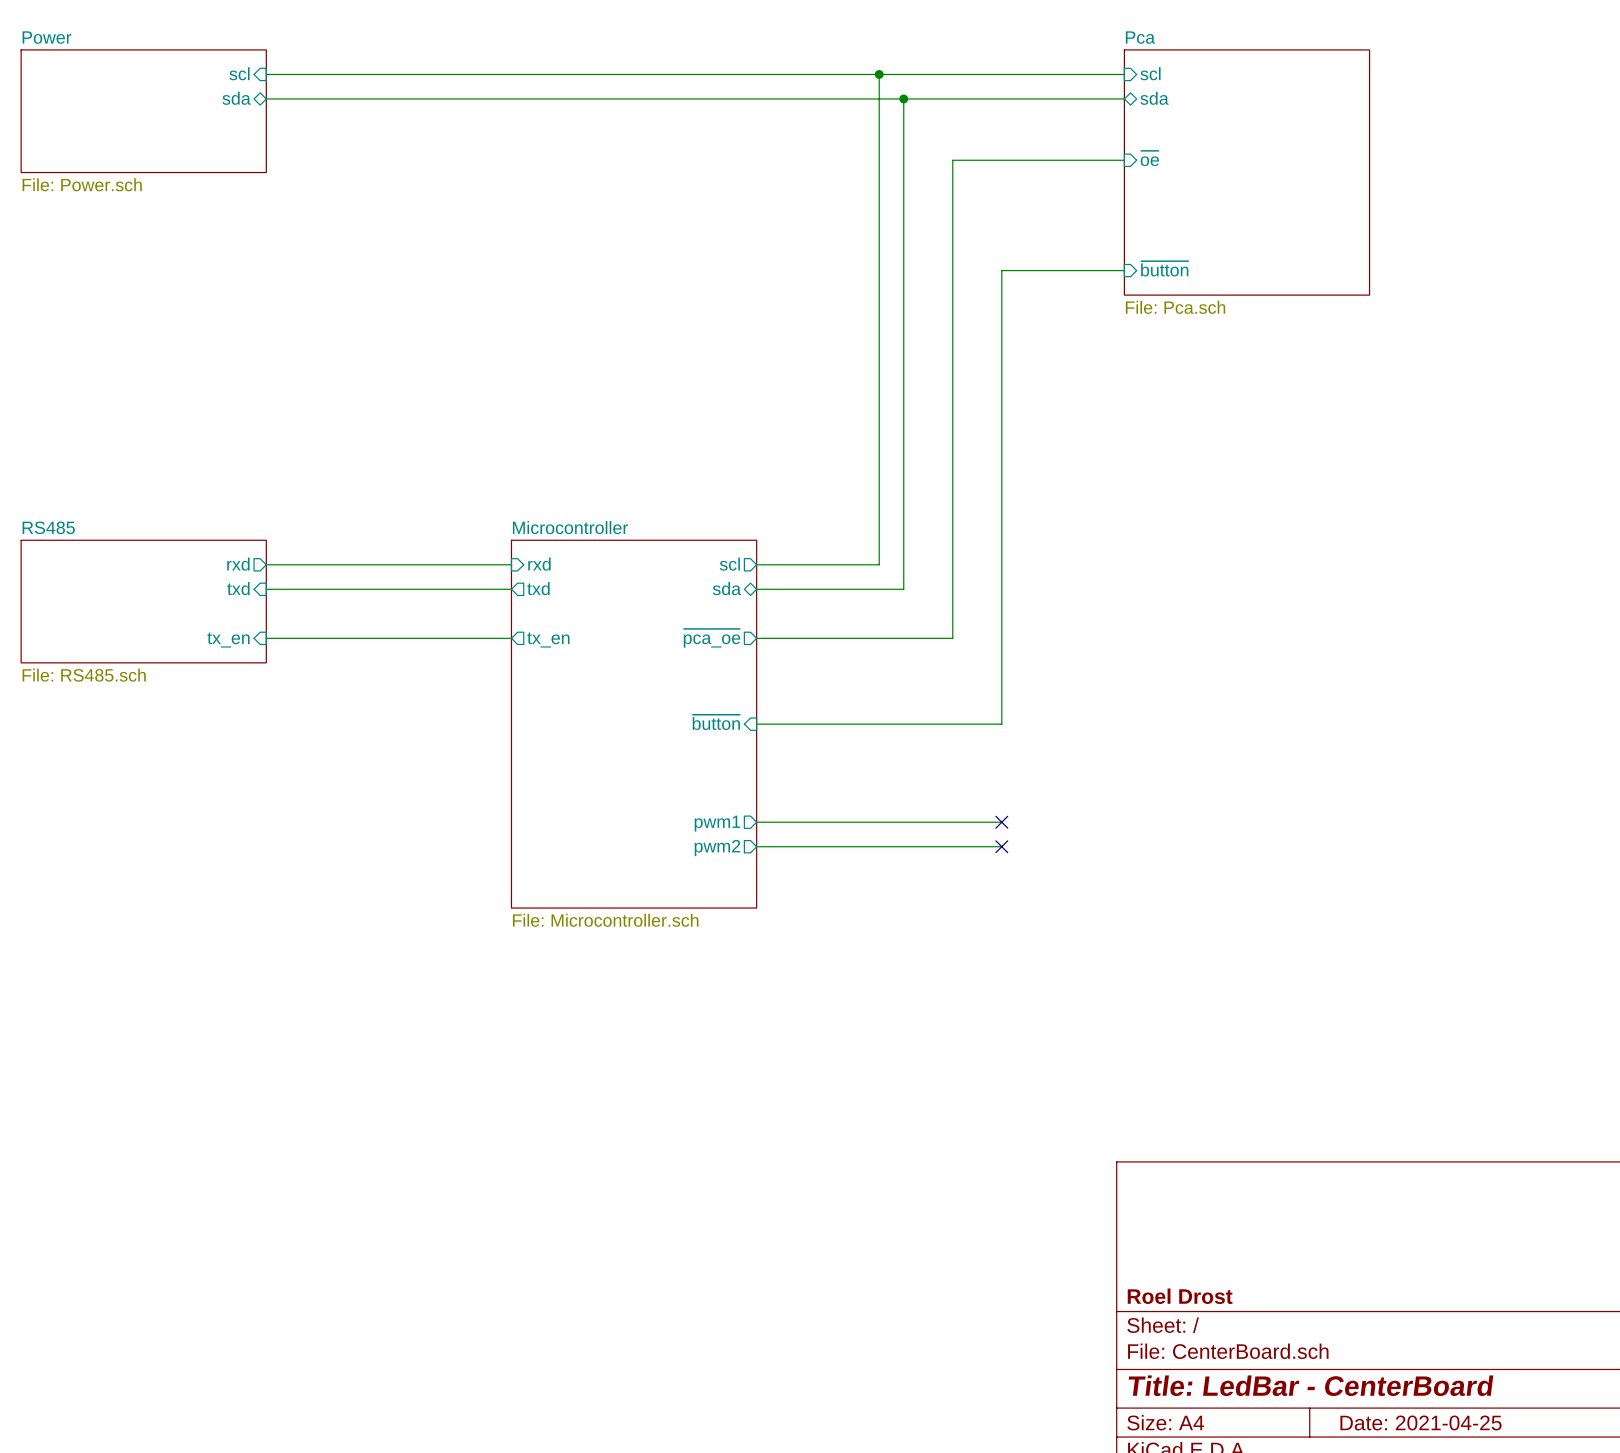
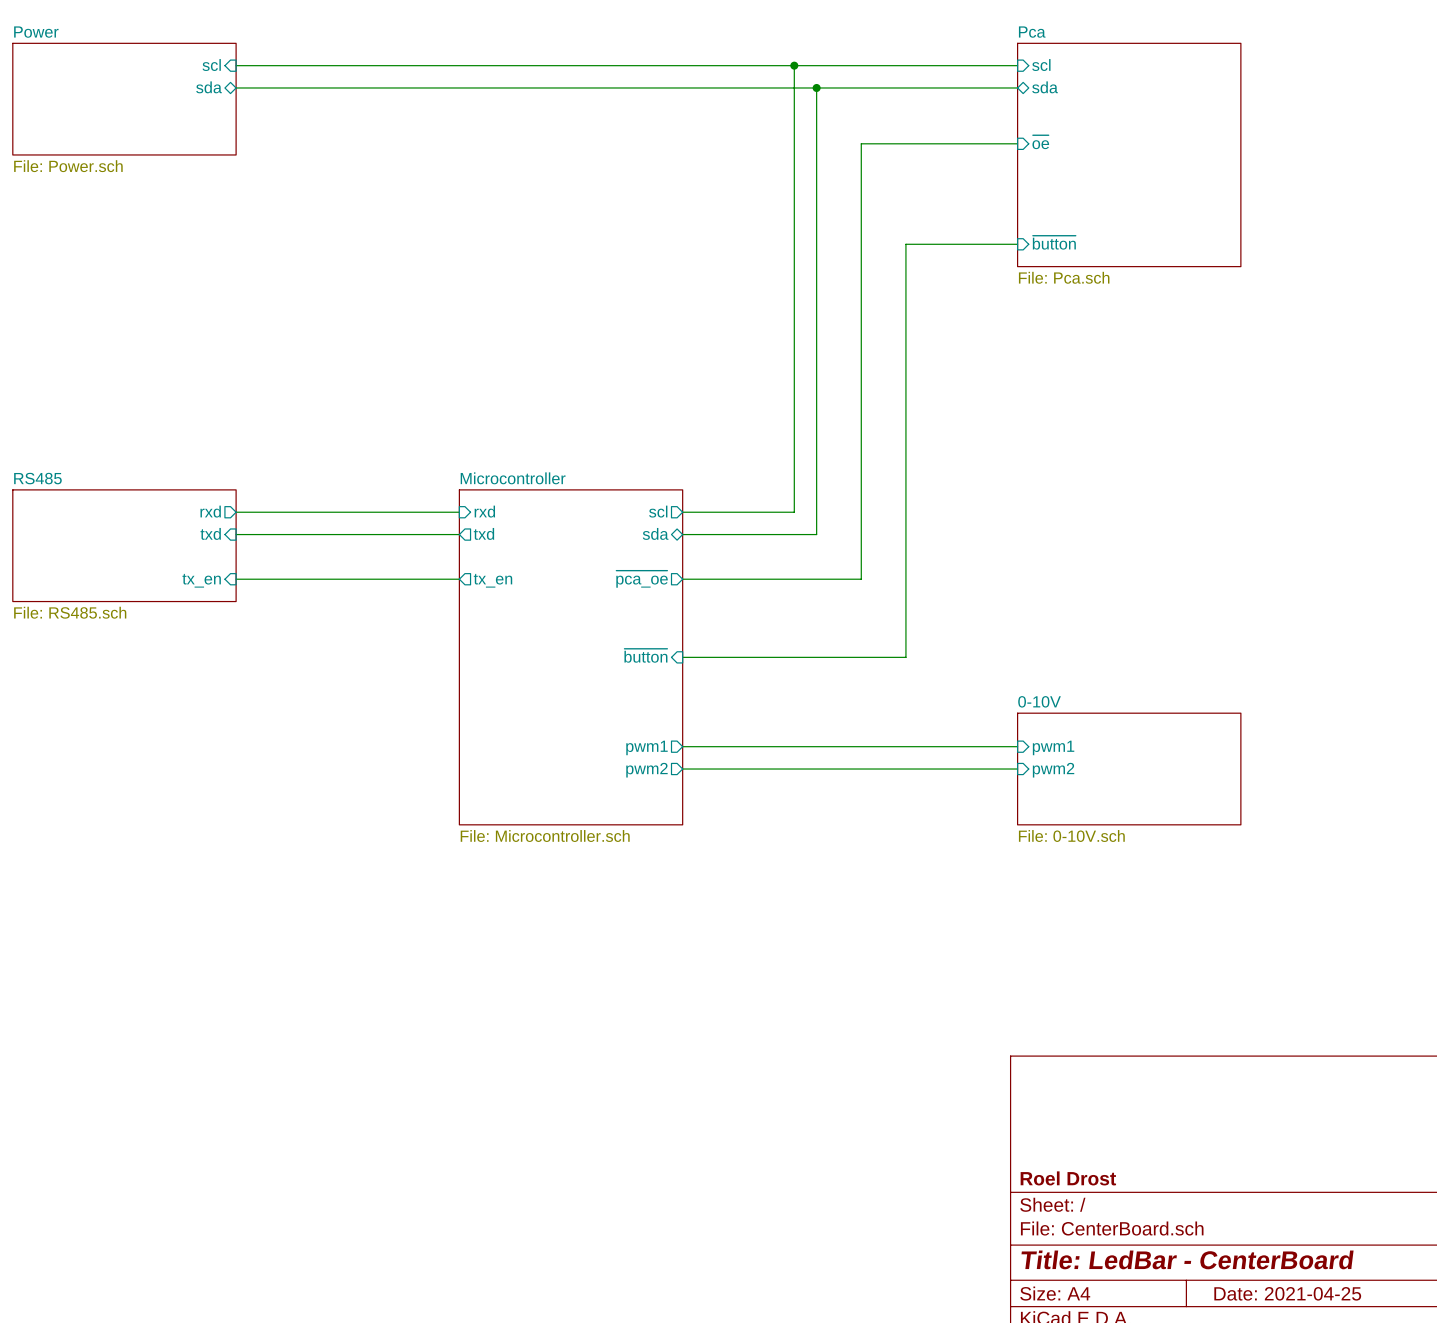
wire: none -> (905, 746) (1017, 746)
no-connect mark: (1001, 822) -> none
sheet pin: none -> pwm1 (1053, 747)
wire: none -> (905, 769) (1017, 769)
no-connect mark: (1001, 846) -> none
sheet 0-10V: none -> File: 0-10V.sch (1129, 769)
sheet pin: none -> pwm2 (1053, 770)

